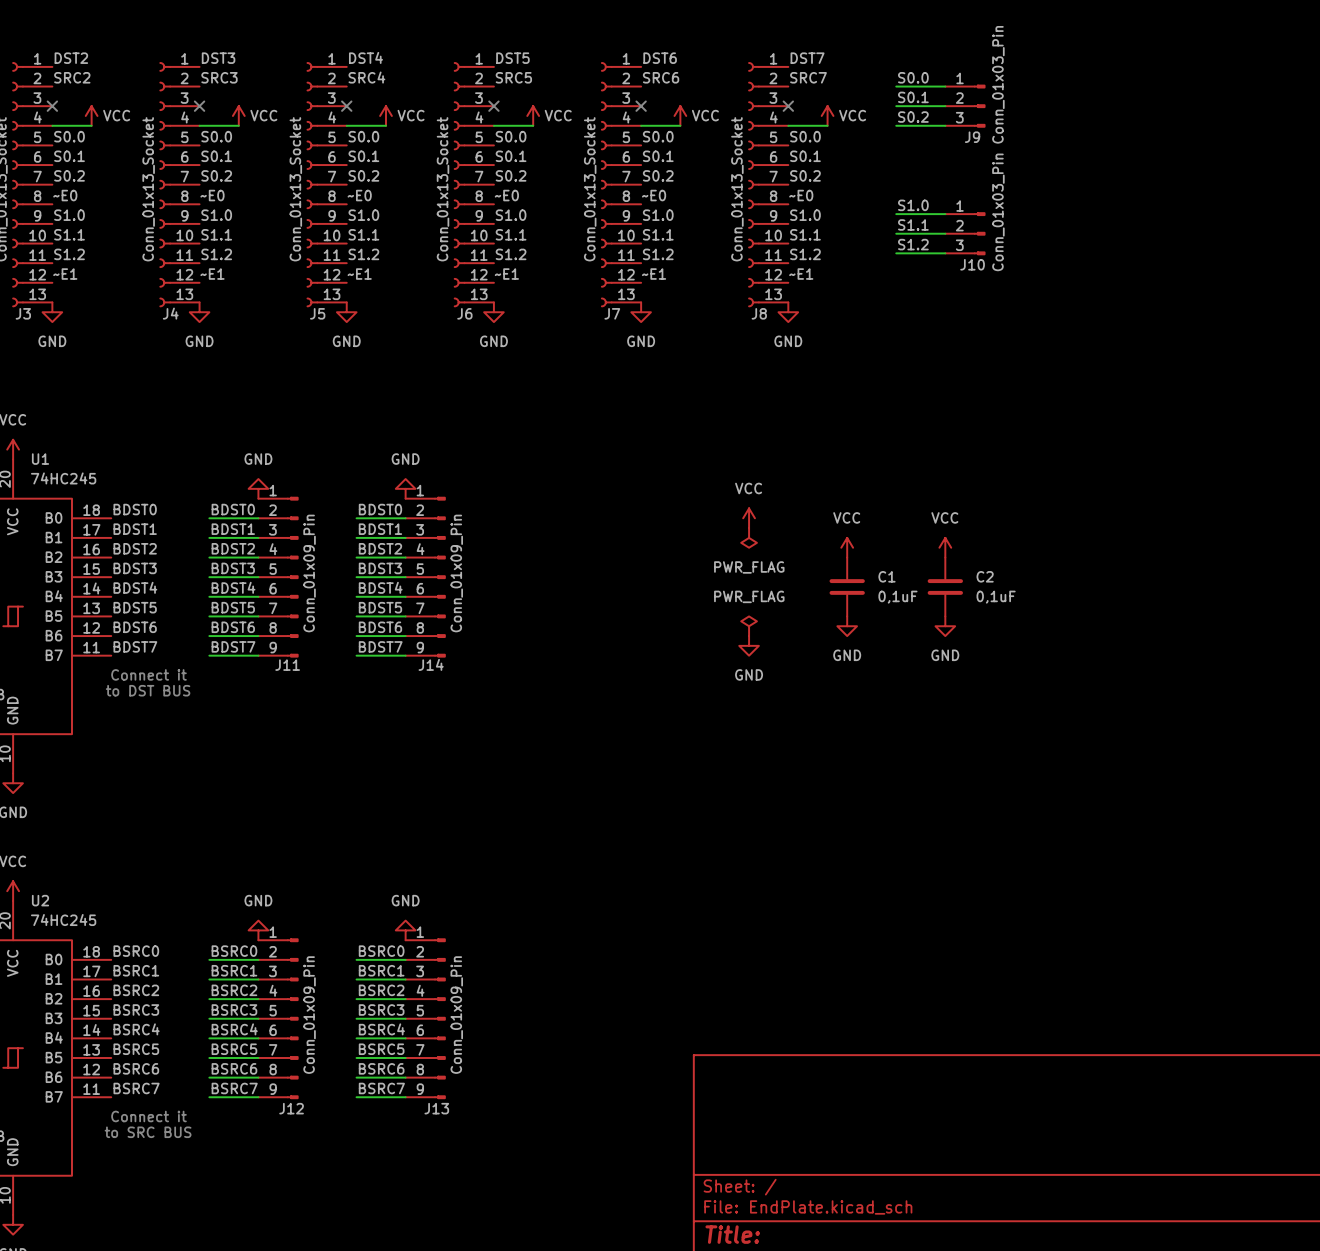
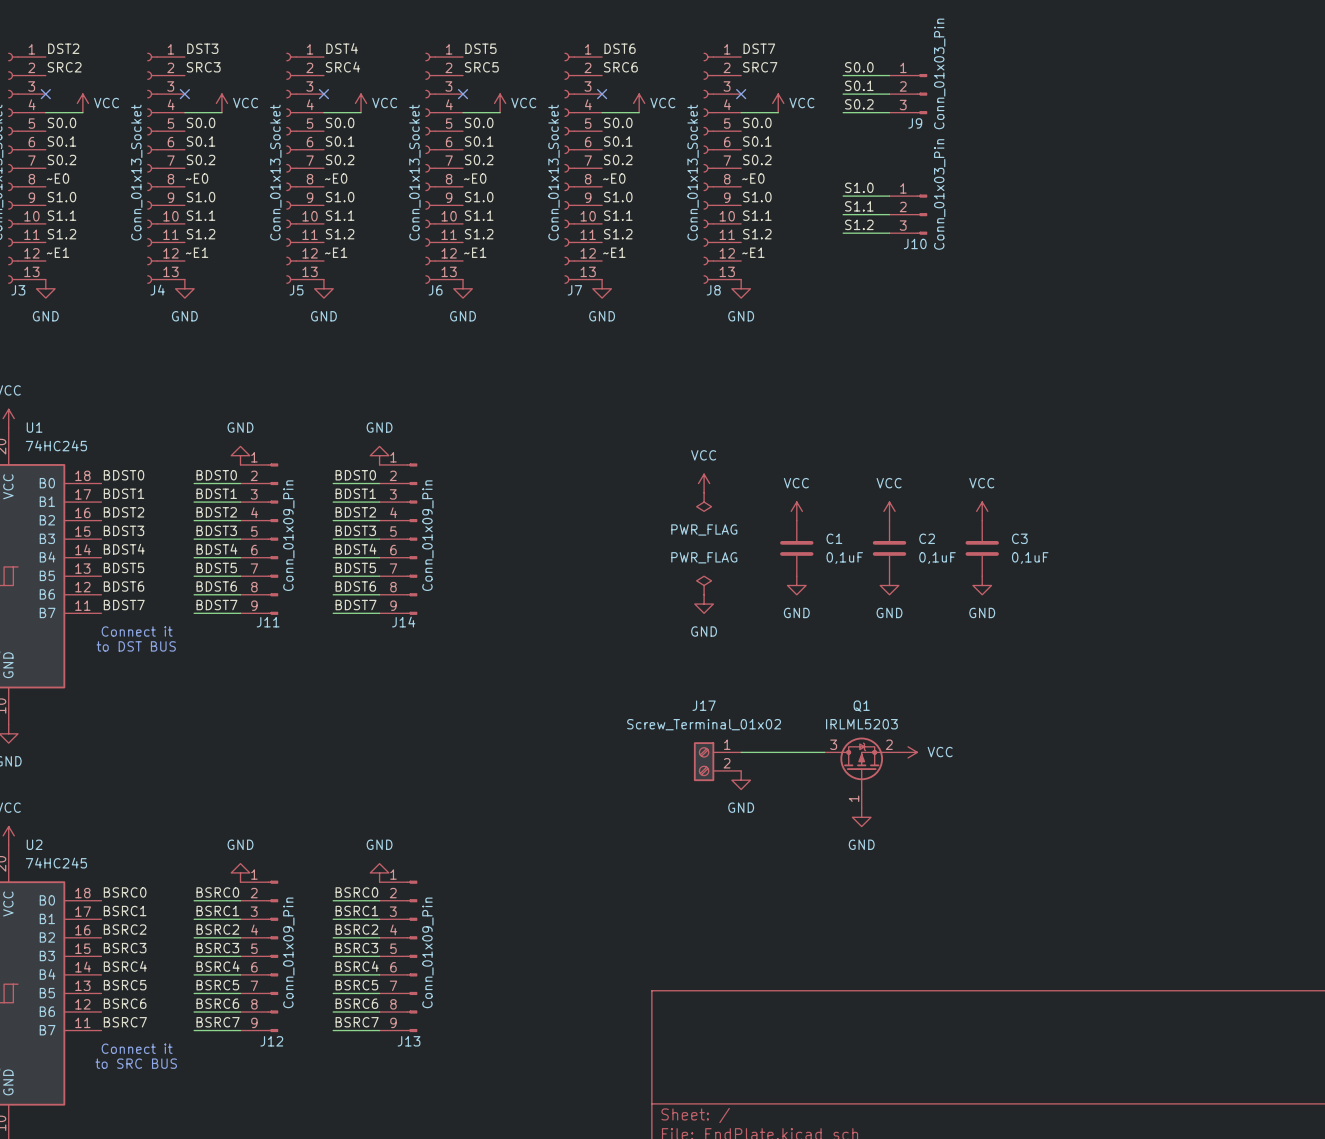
power symbol: none -> VCC (982, 511)
C3: none -> 0,1uF (982, 548)
power symbol: none -> GND (982, 585)
wire: none -> (741, 752) (824, 752)
power symbol: none -> VCC (908, 752)
J17: none -> Screw_Terminal_01x02 (717, 761)
Q1: none -> IRLML5203 (861, 772)
power symbol: none -> GND (741, 780)
power symbol: none -> GND (861, 817)

